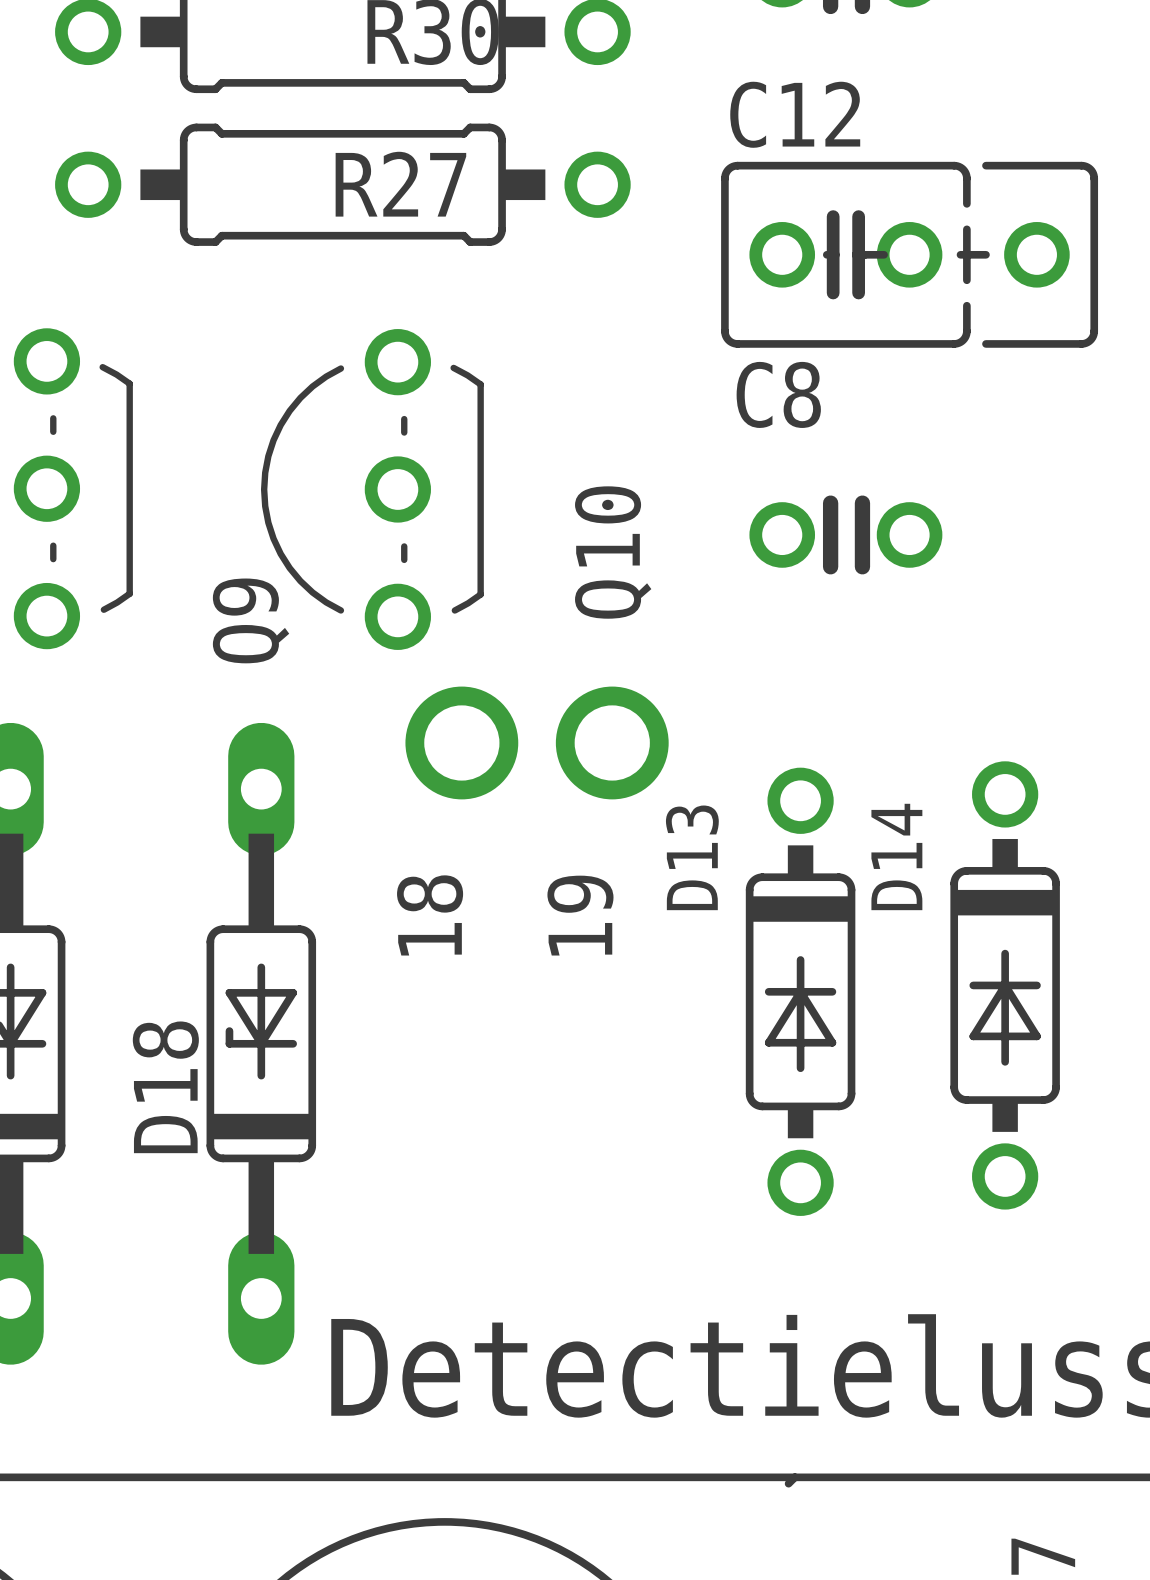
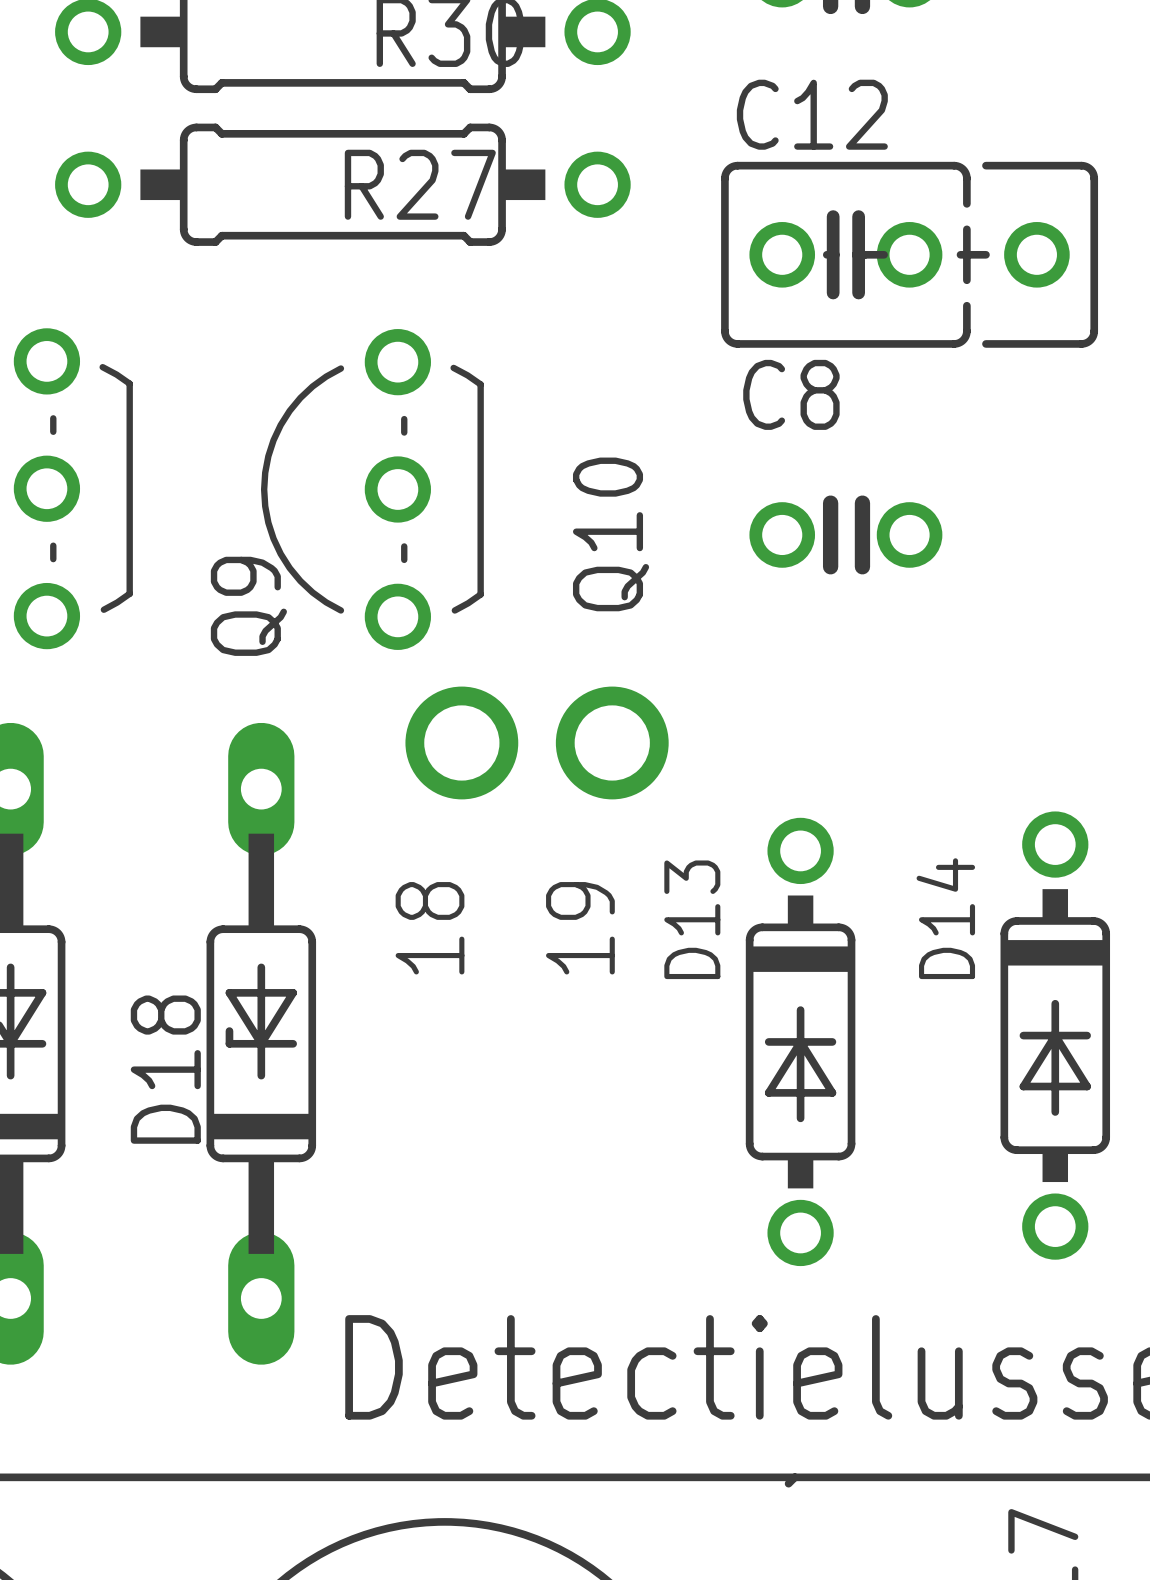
D14 position: (1005, 985) -> (1055, 1035)
D13 position: (800, 991) -> (800, 1041)

